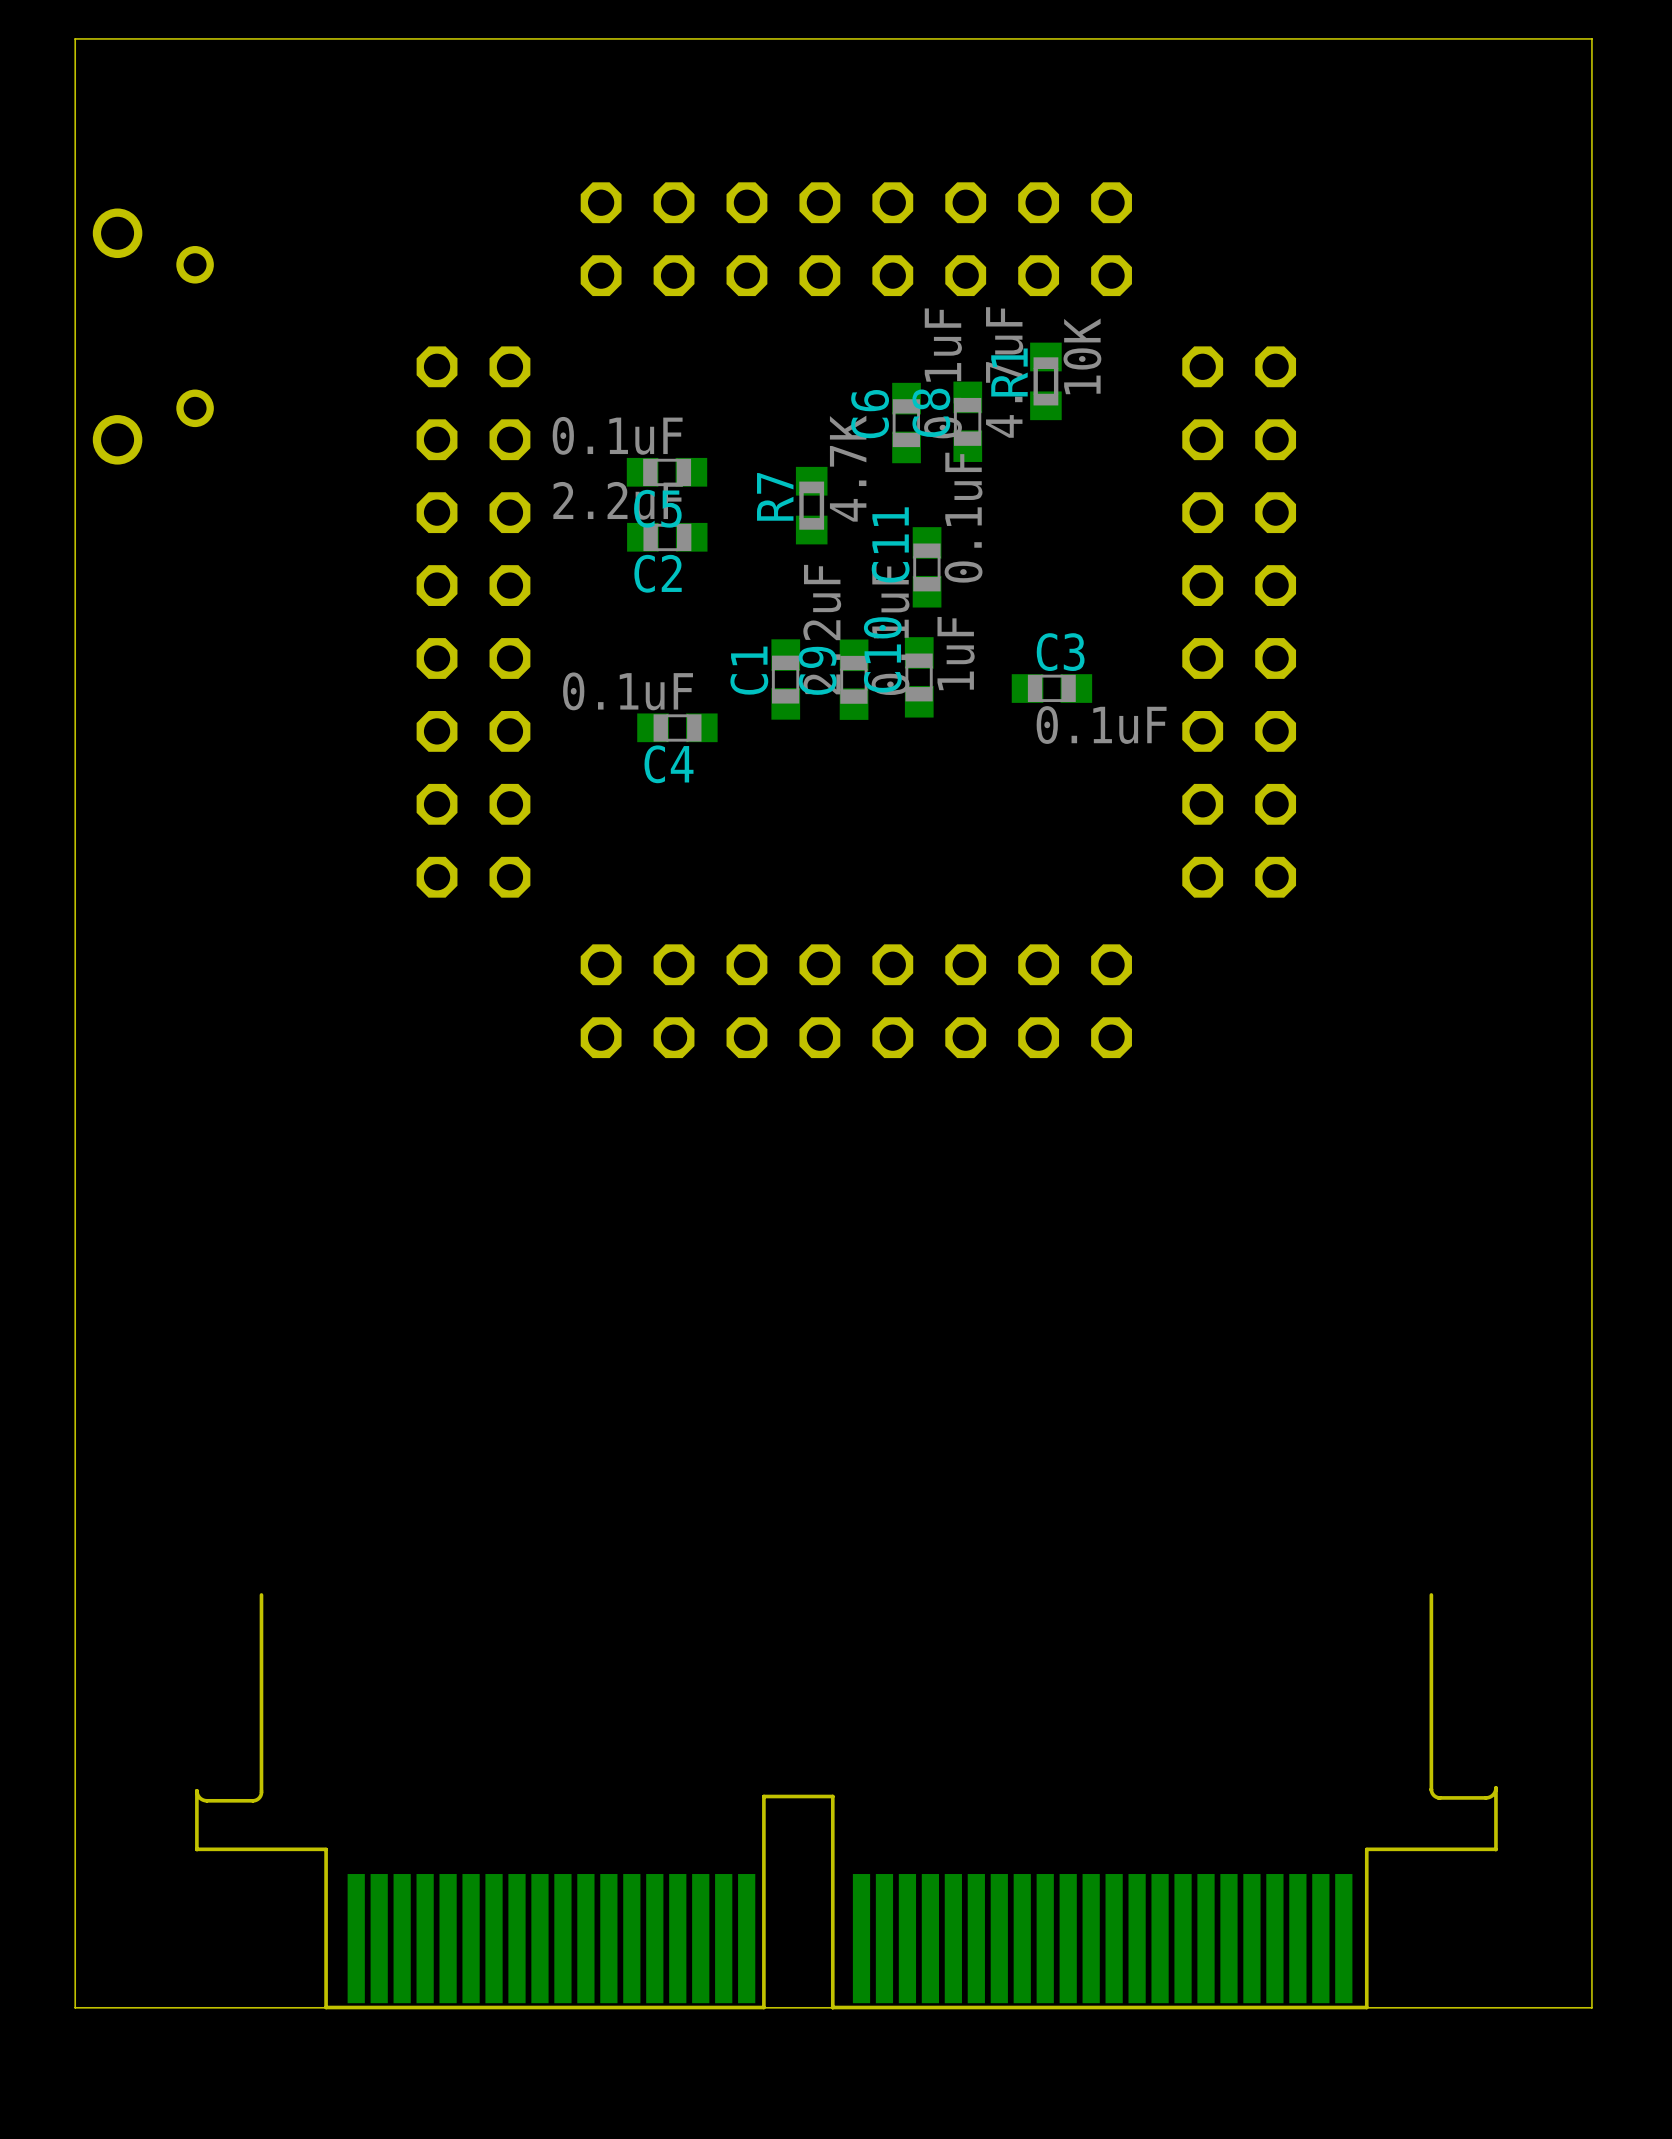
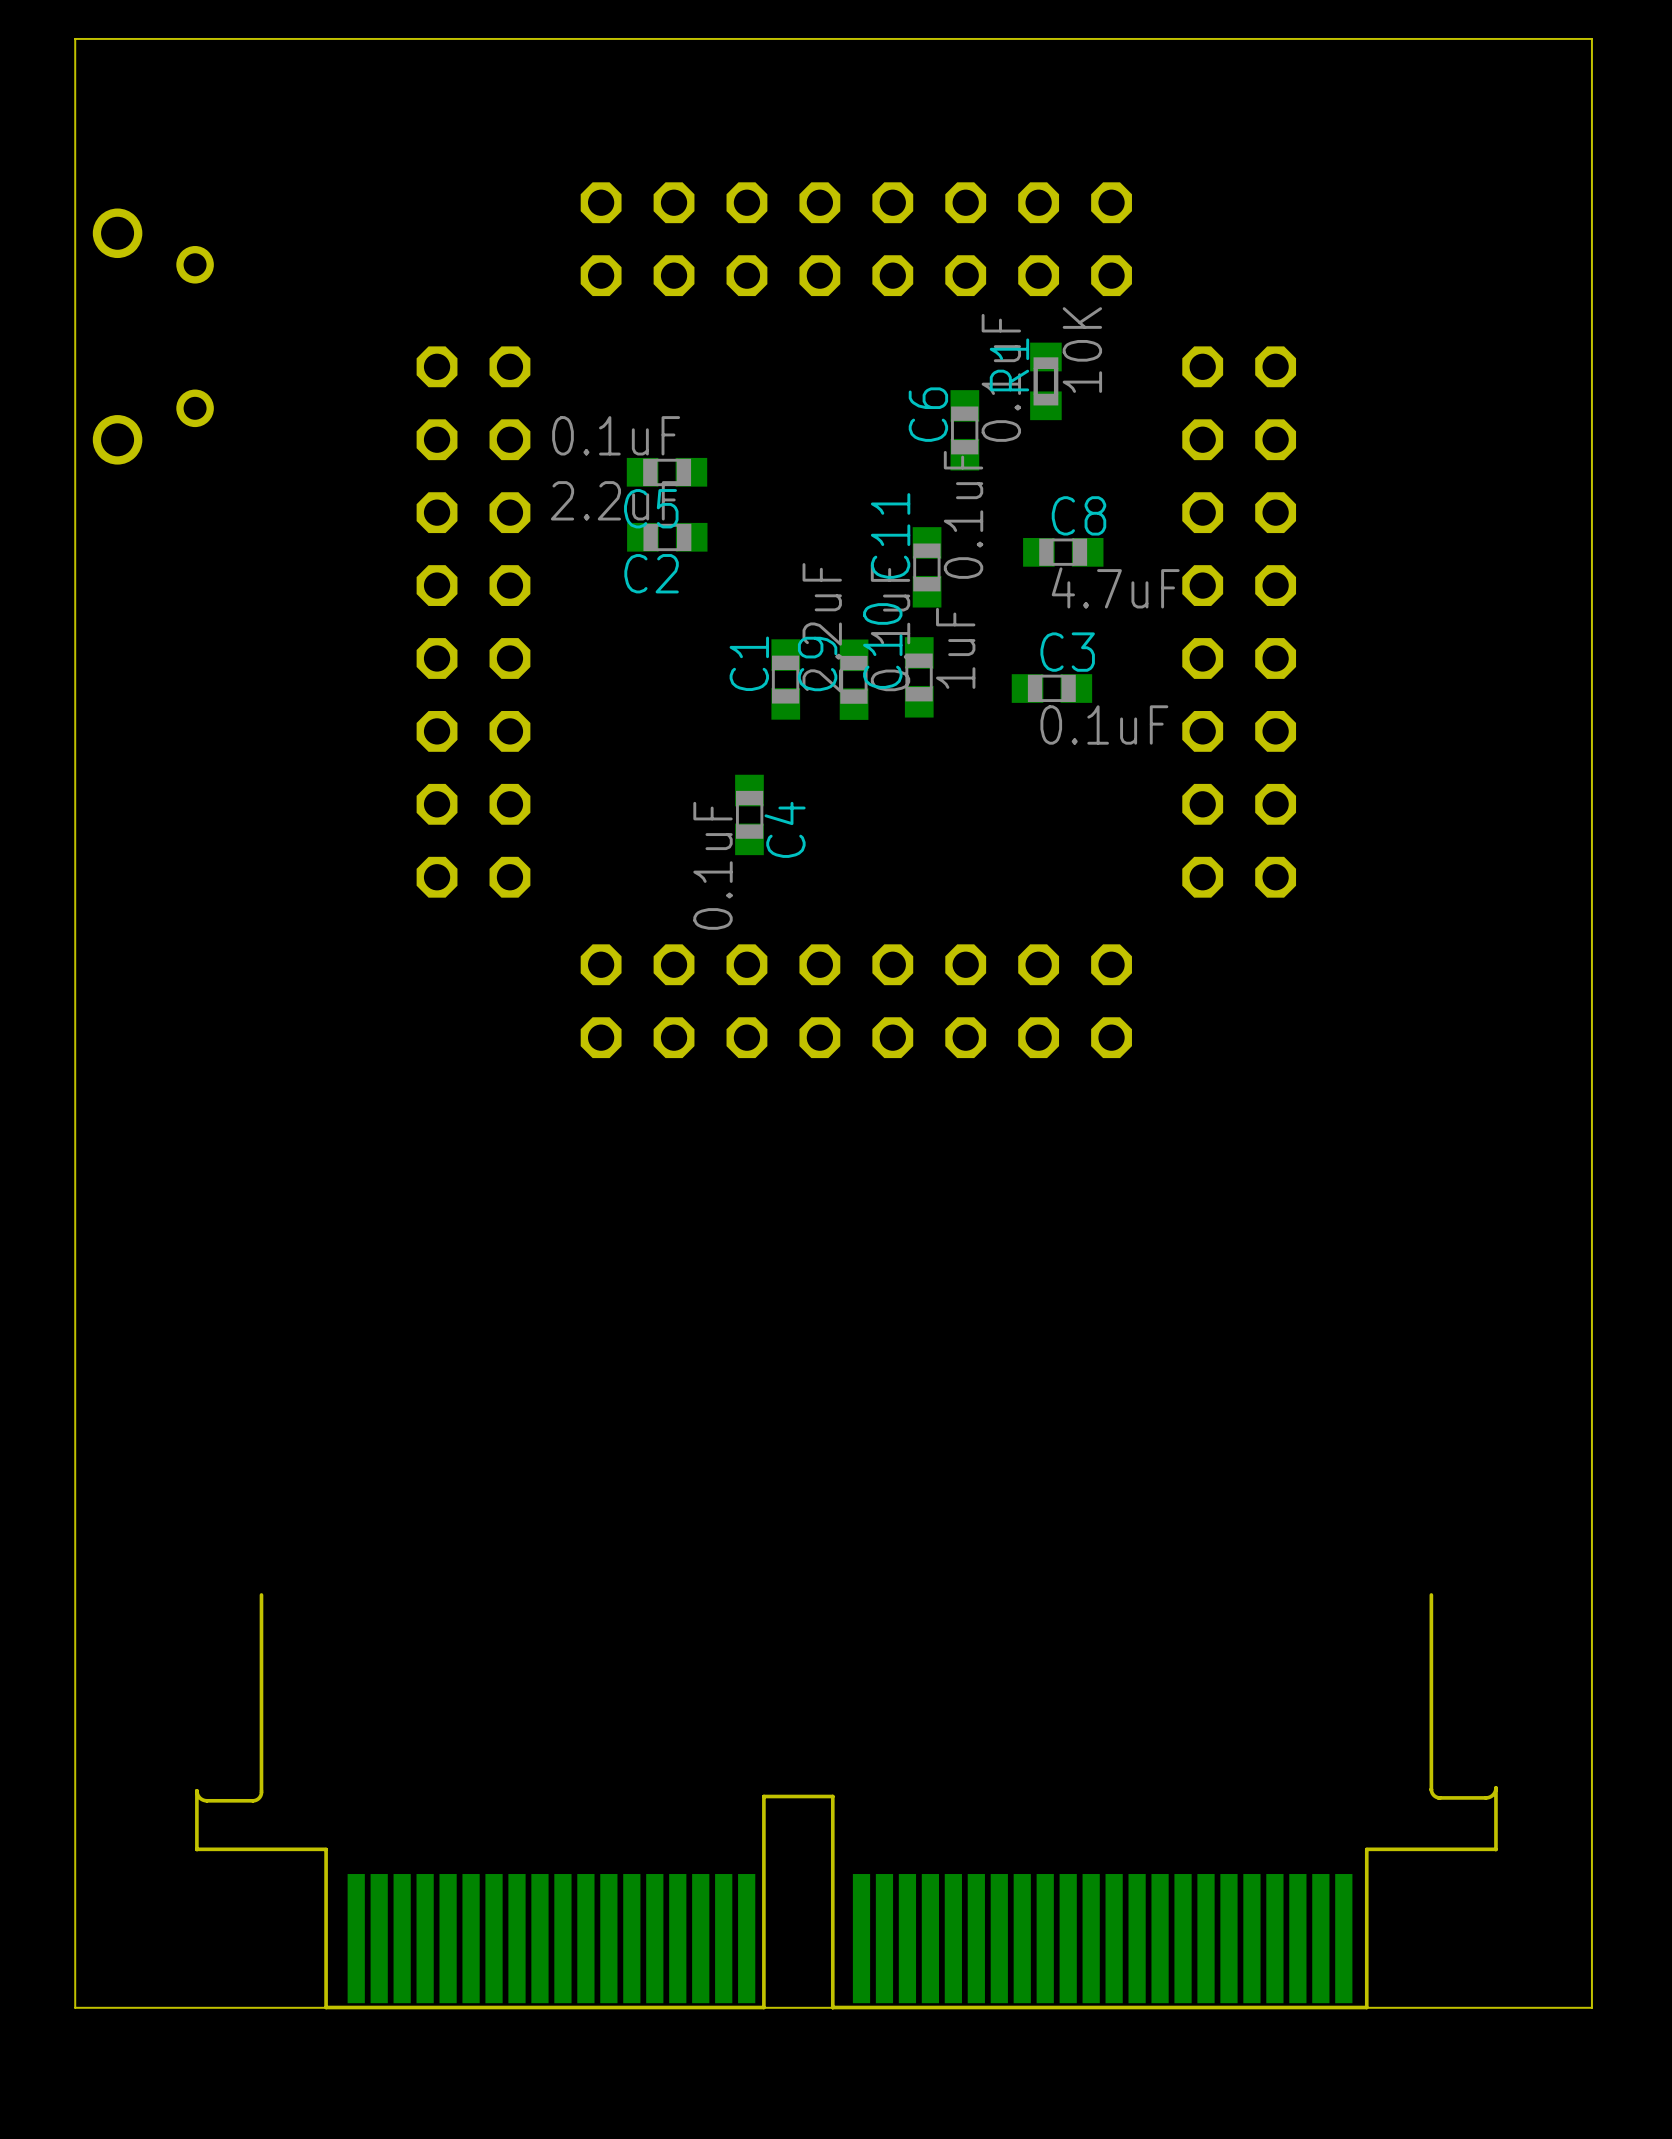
C8 rotation: 0° (967, 421) -> 90° clockwise (1063, 552)
C8 position: (967, 421) -> (1063, 552)
C6 position: (906, 423) -> (964, 430)
R7: 4.7K (811, 505) -> none
C4 value position: 0.1uF (628, 691) -> 0.1uF (713, 865)
C4 rotation: 0° (677, 727) -> 90° clockwise (749, 814)
C4 position: (677, 727) -> (749, 814)
C4 name position: C4 (669, 764) -> C4 (785, 829)

